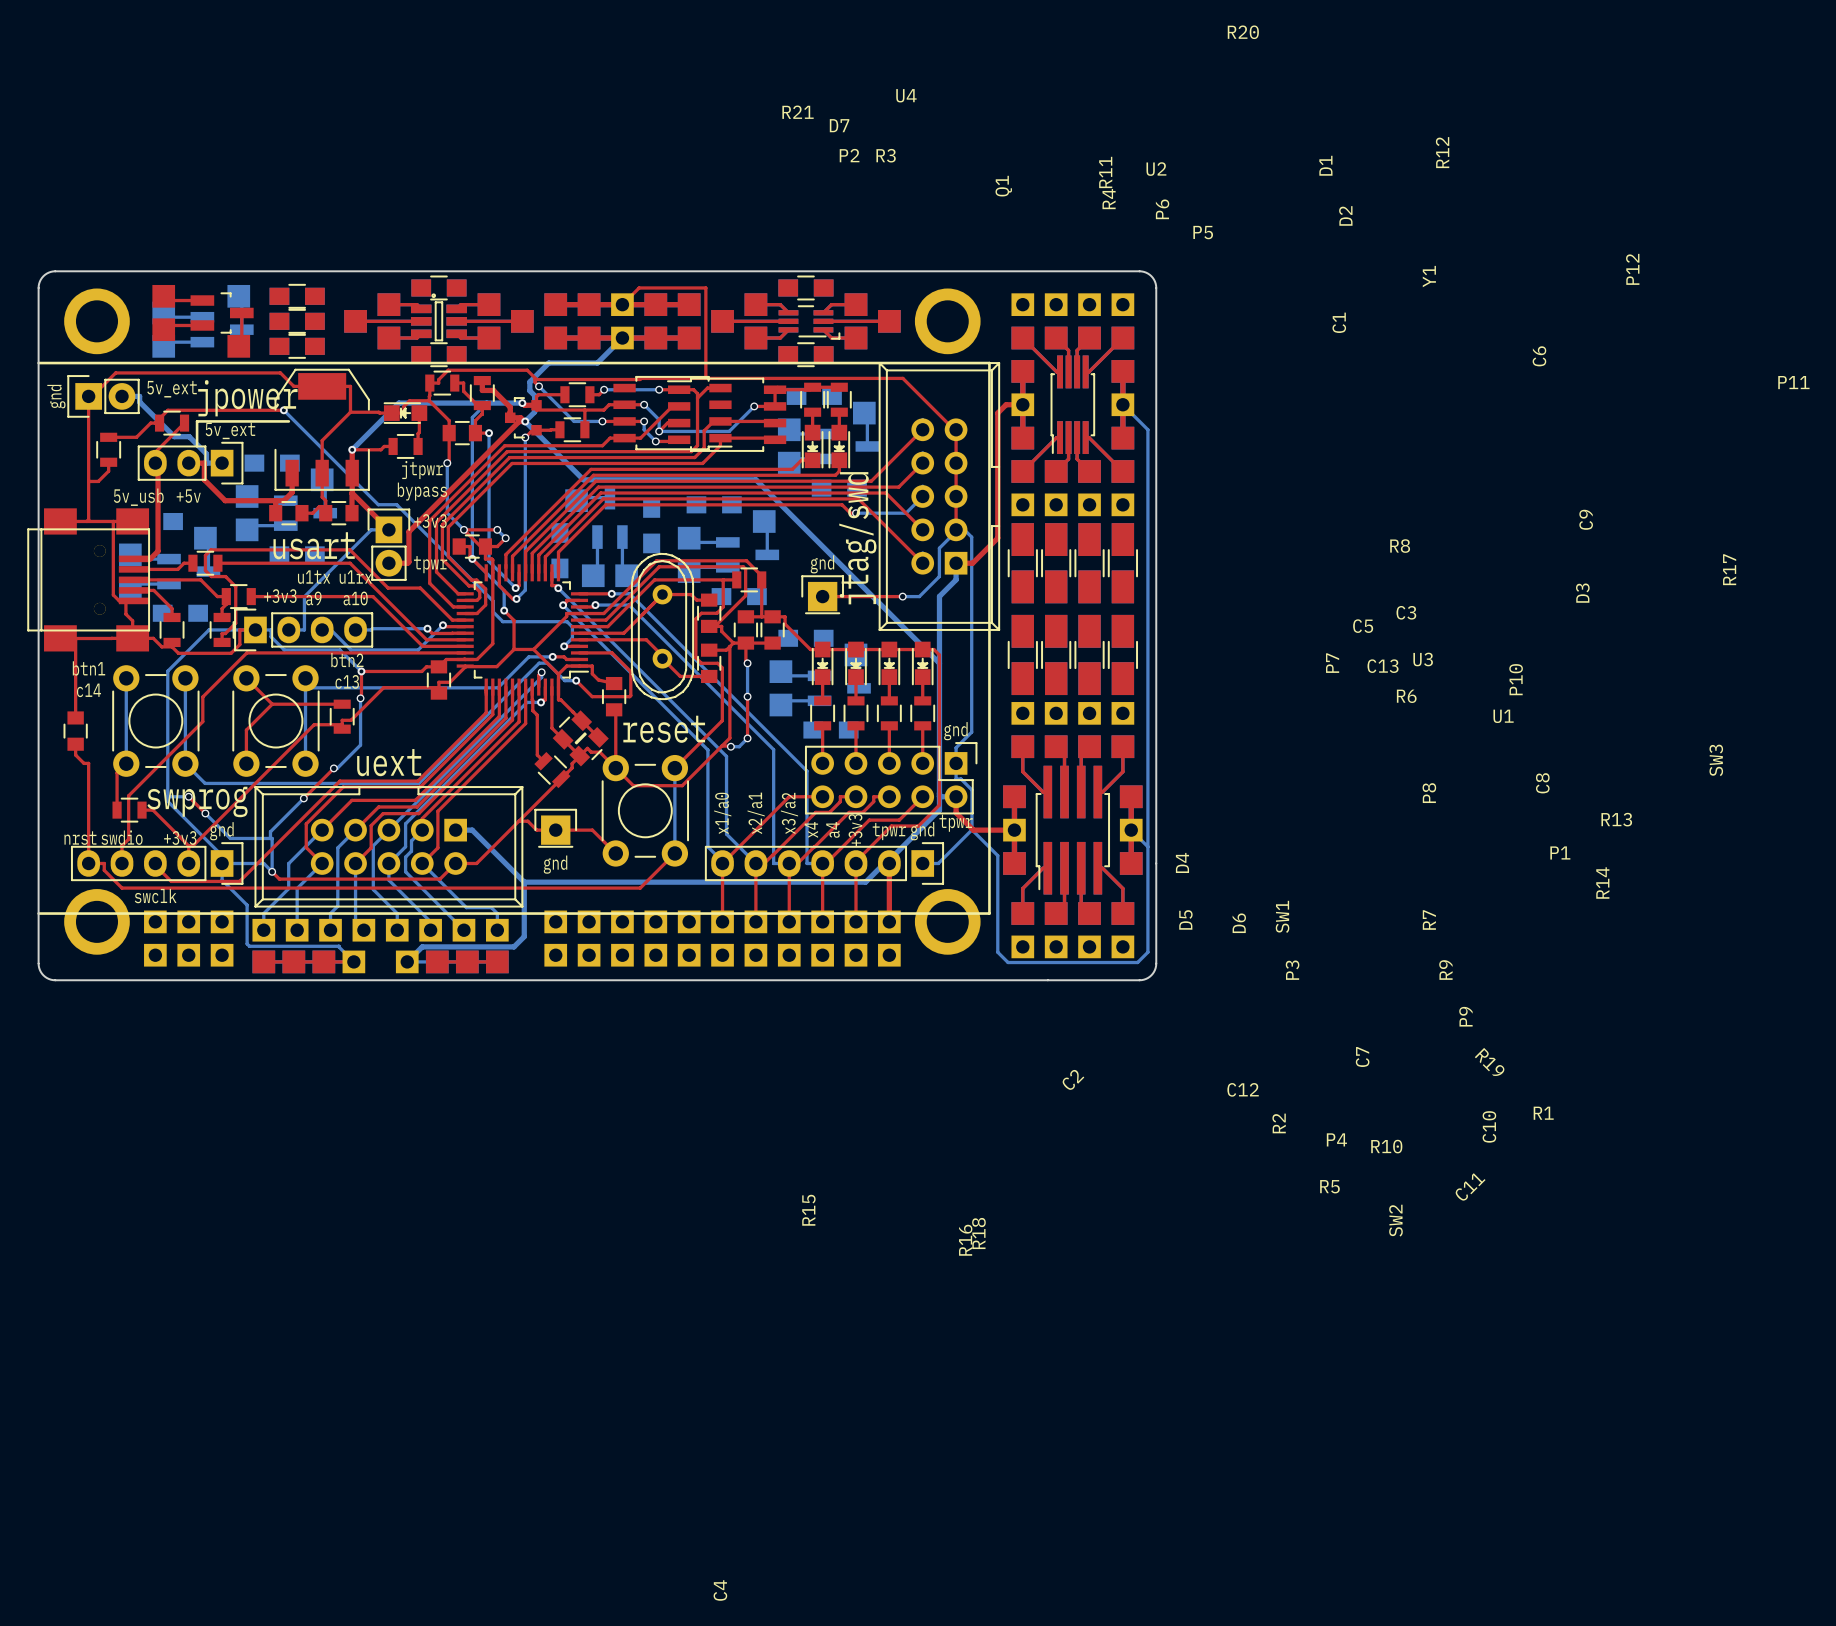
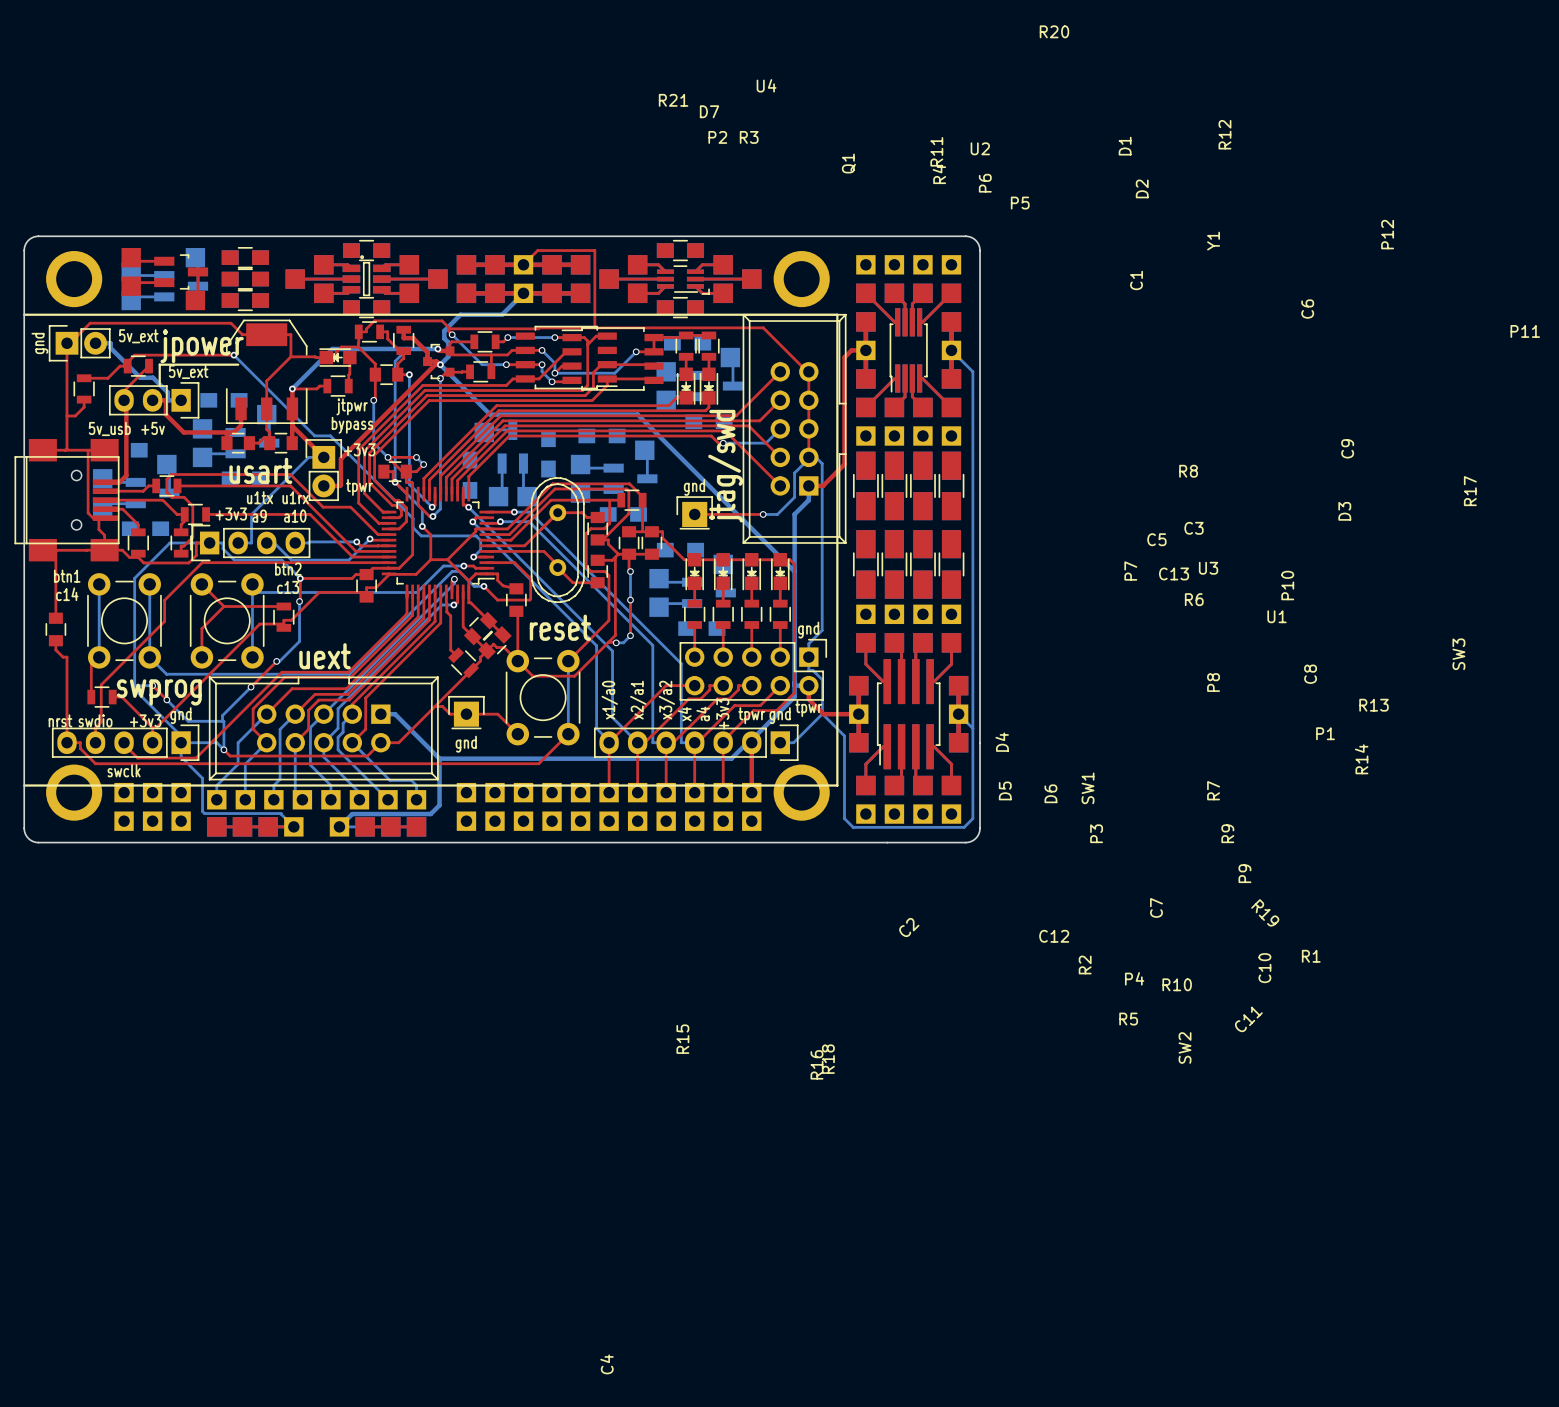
P1 footprint: [27, 508, 151, 652] -> [14, 438, 120, 562]

